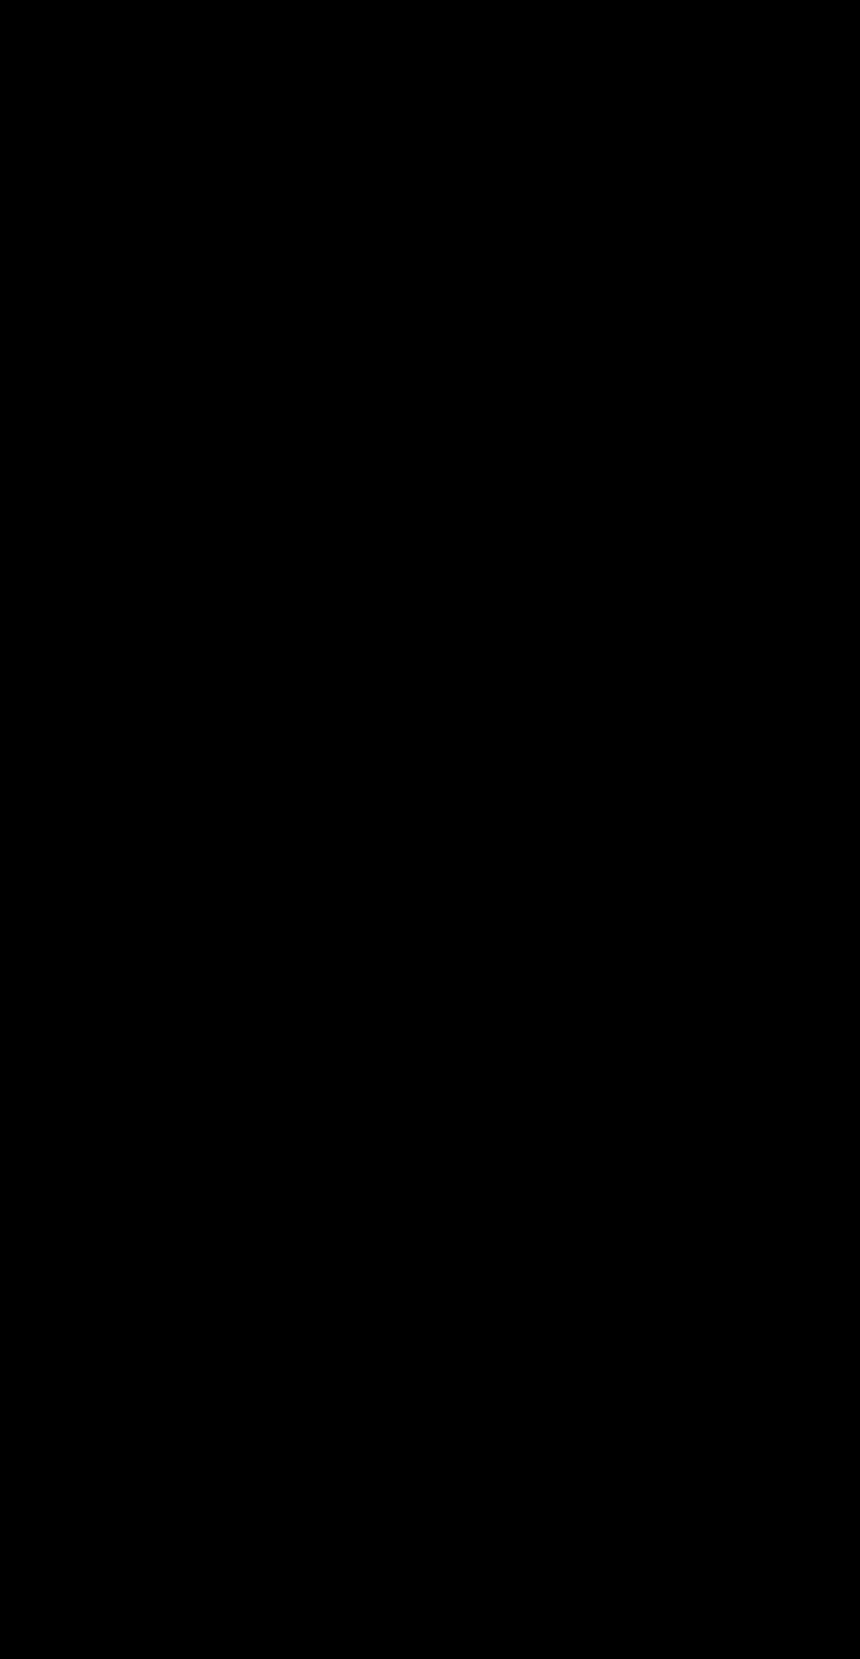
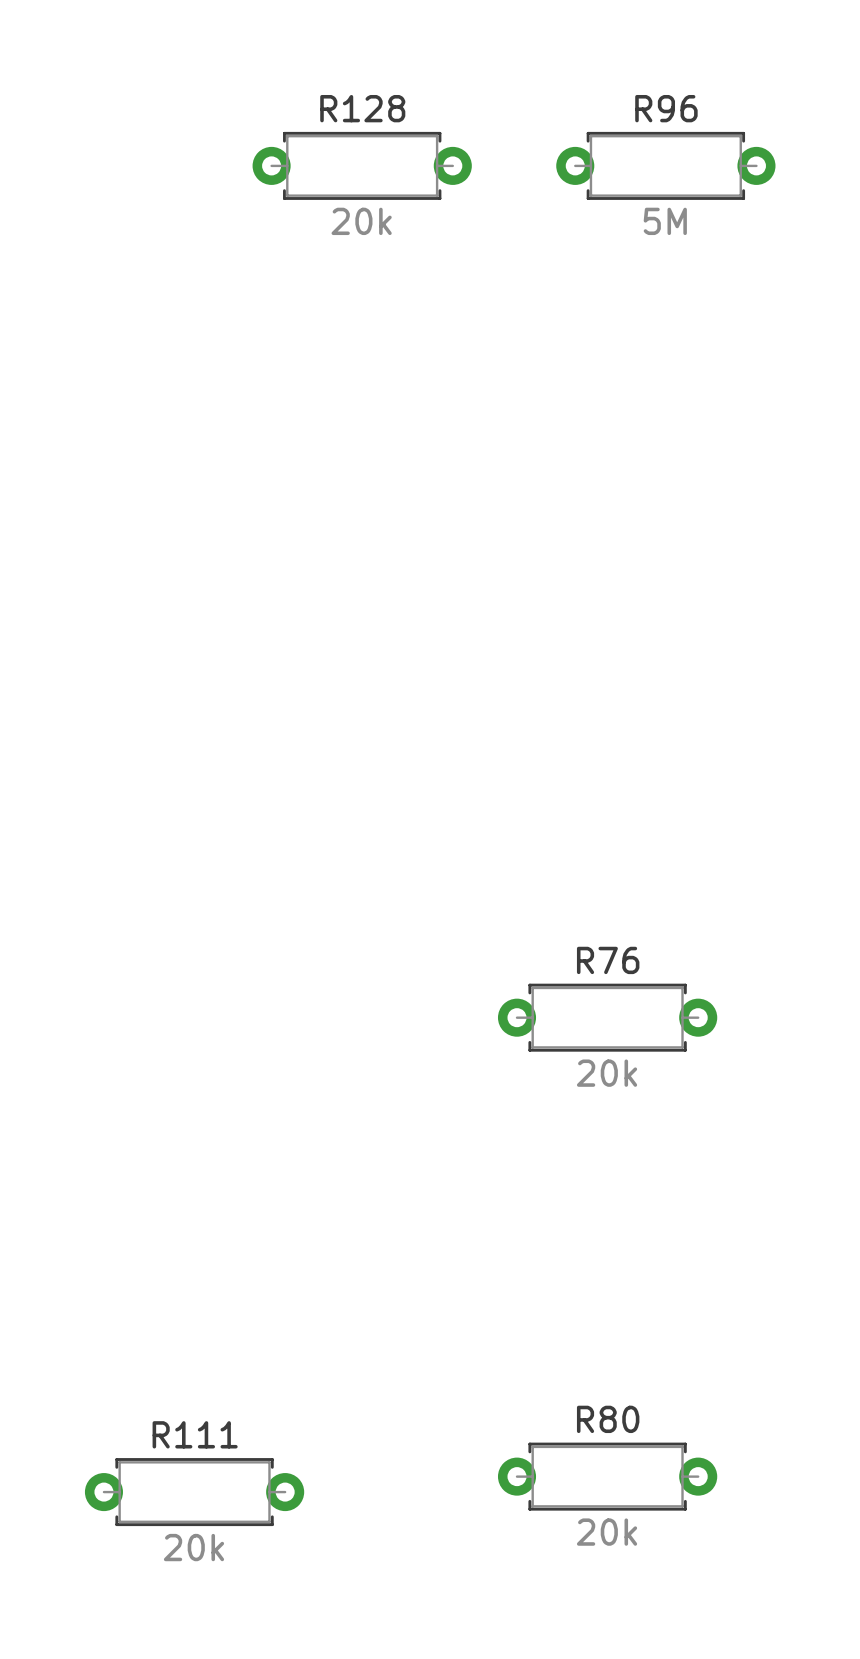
R128: none -> 20k (362, 165)
R96: none -> 5M (665, 165)
R76: none -> 20k (607, 1017)
R80: none -> 20k (607, 1476)
R111: none -> 20k (194, 1492)

